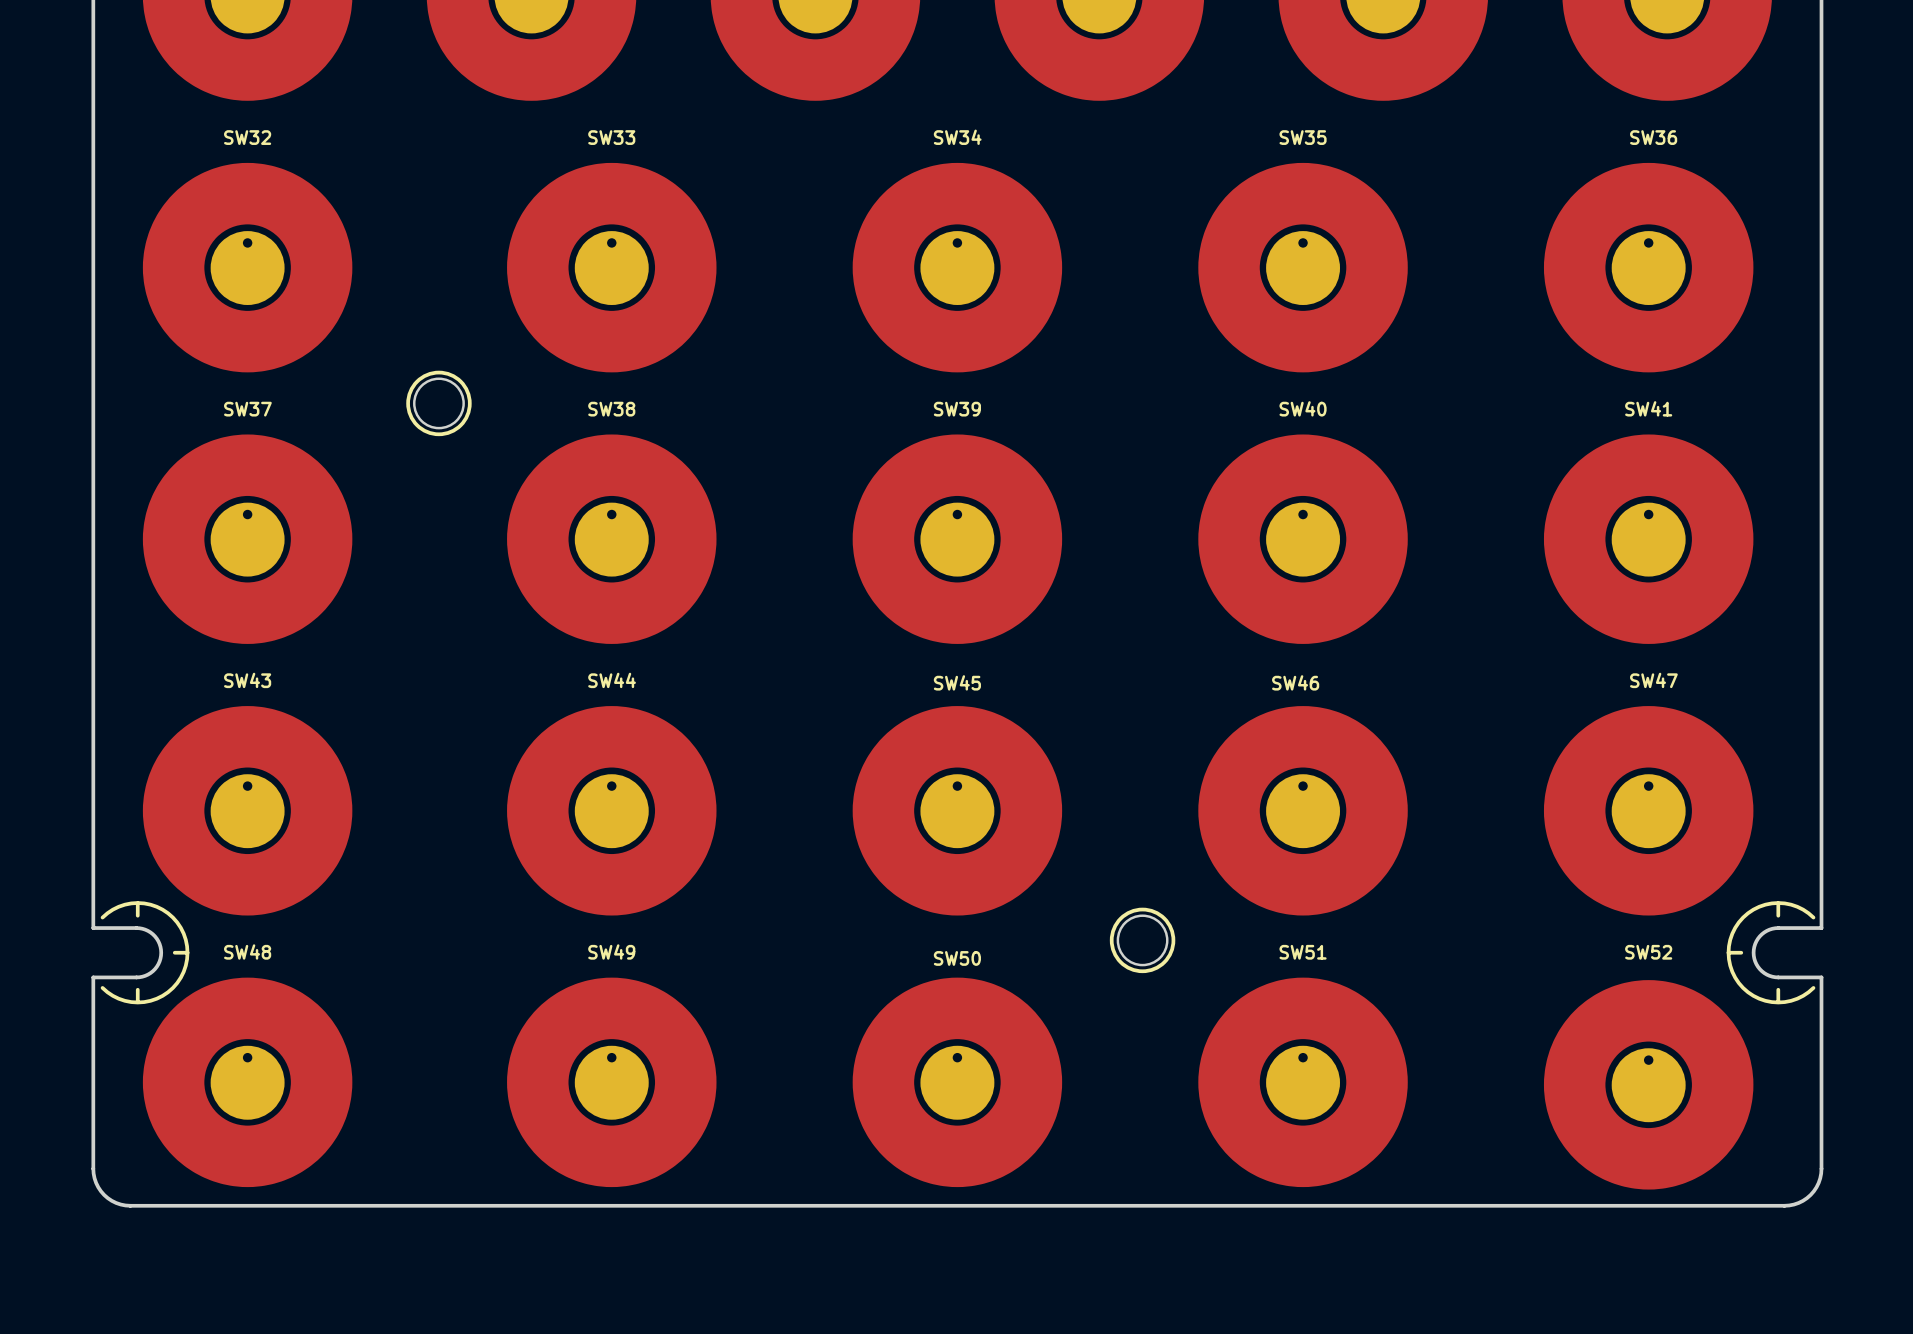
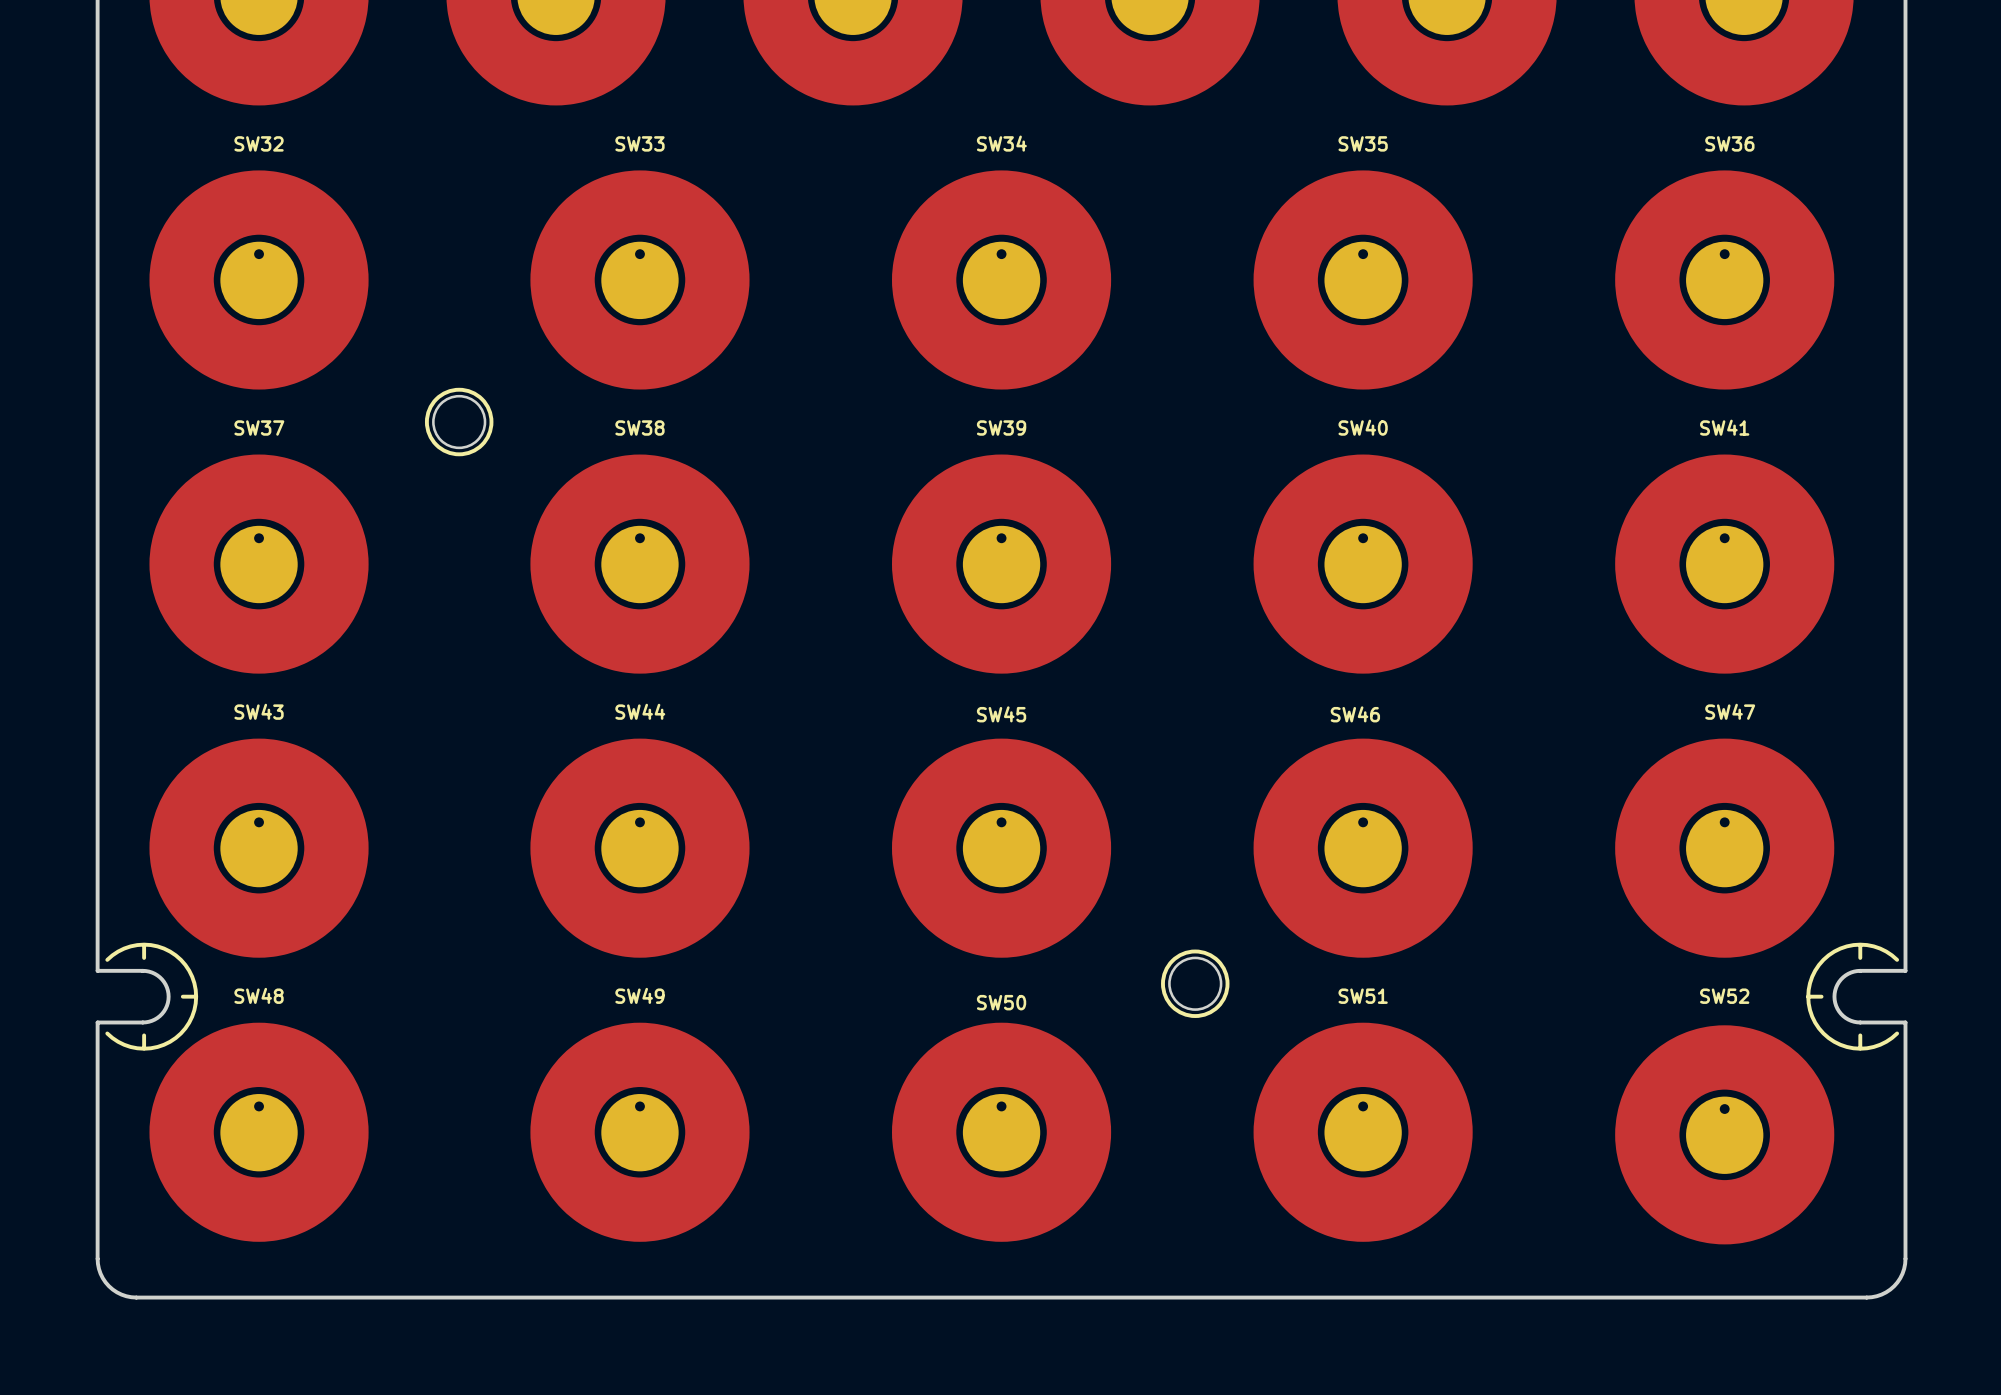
board edge: (93, 1168) (96, 1182) (104, 1194) (116, 1202) (130, 1205) (1784, 1205) (1798, 1202) (1810, 1194) (1818, 1182) (1821, 1168) -> (97, 1222) (97, 1263) (102, 1278) (116, 1292) (136, 1297) (1866, 1297) (1886, 1292) (1900, 1278) (1905, 1263) (1905, 1222)

